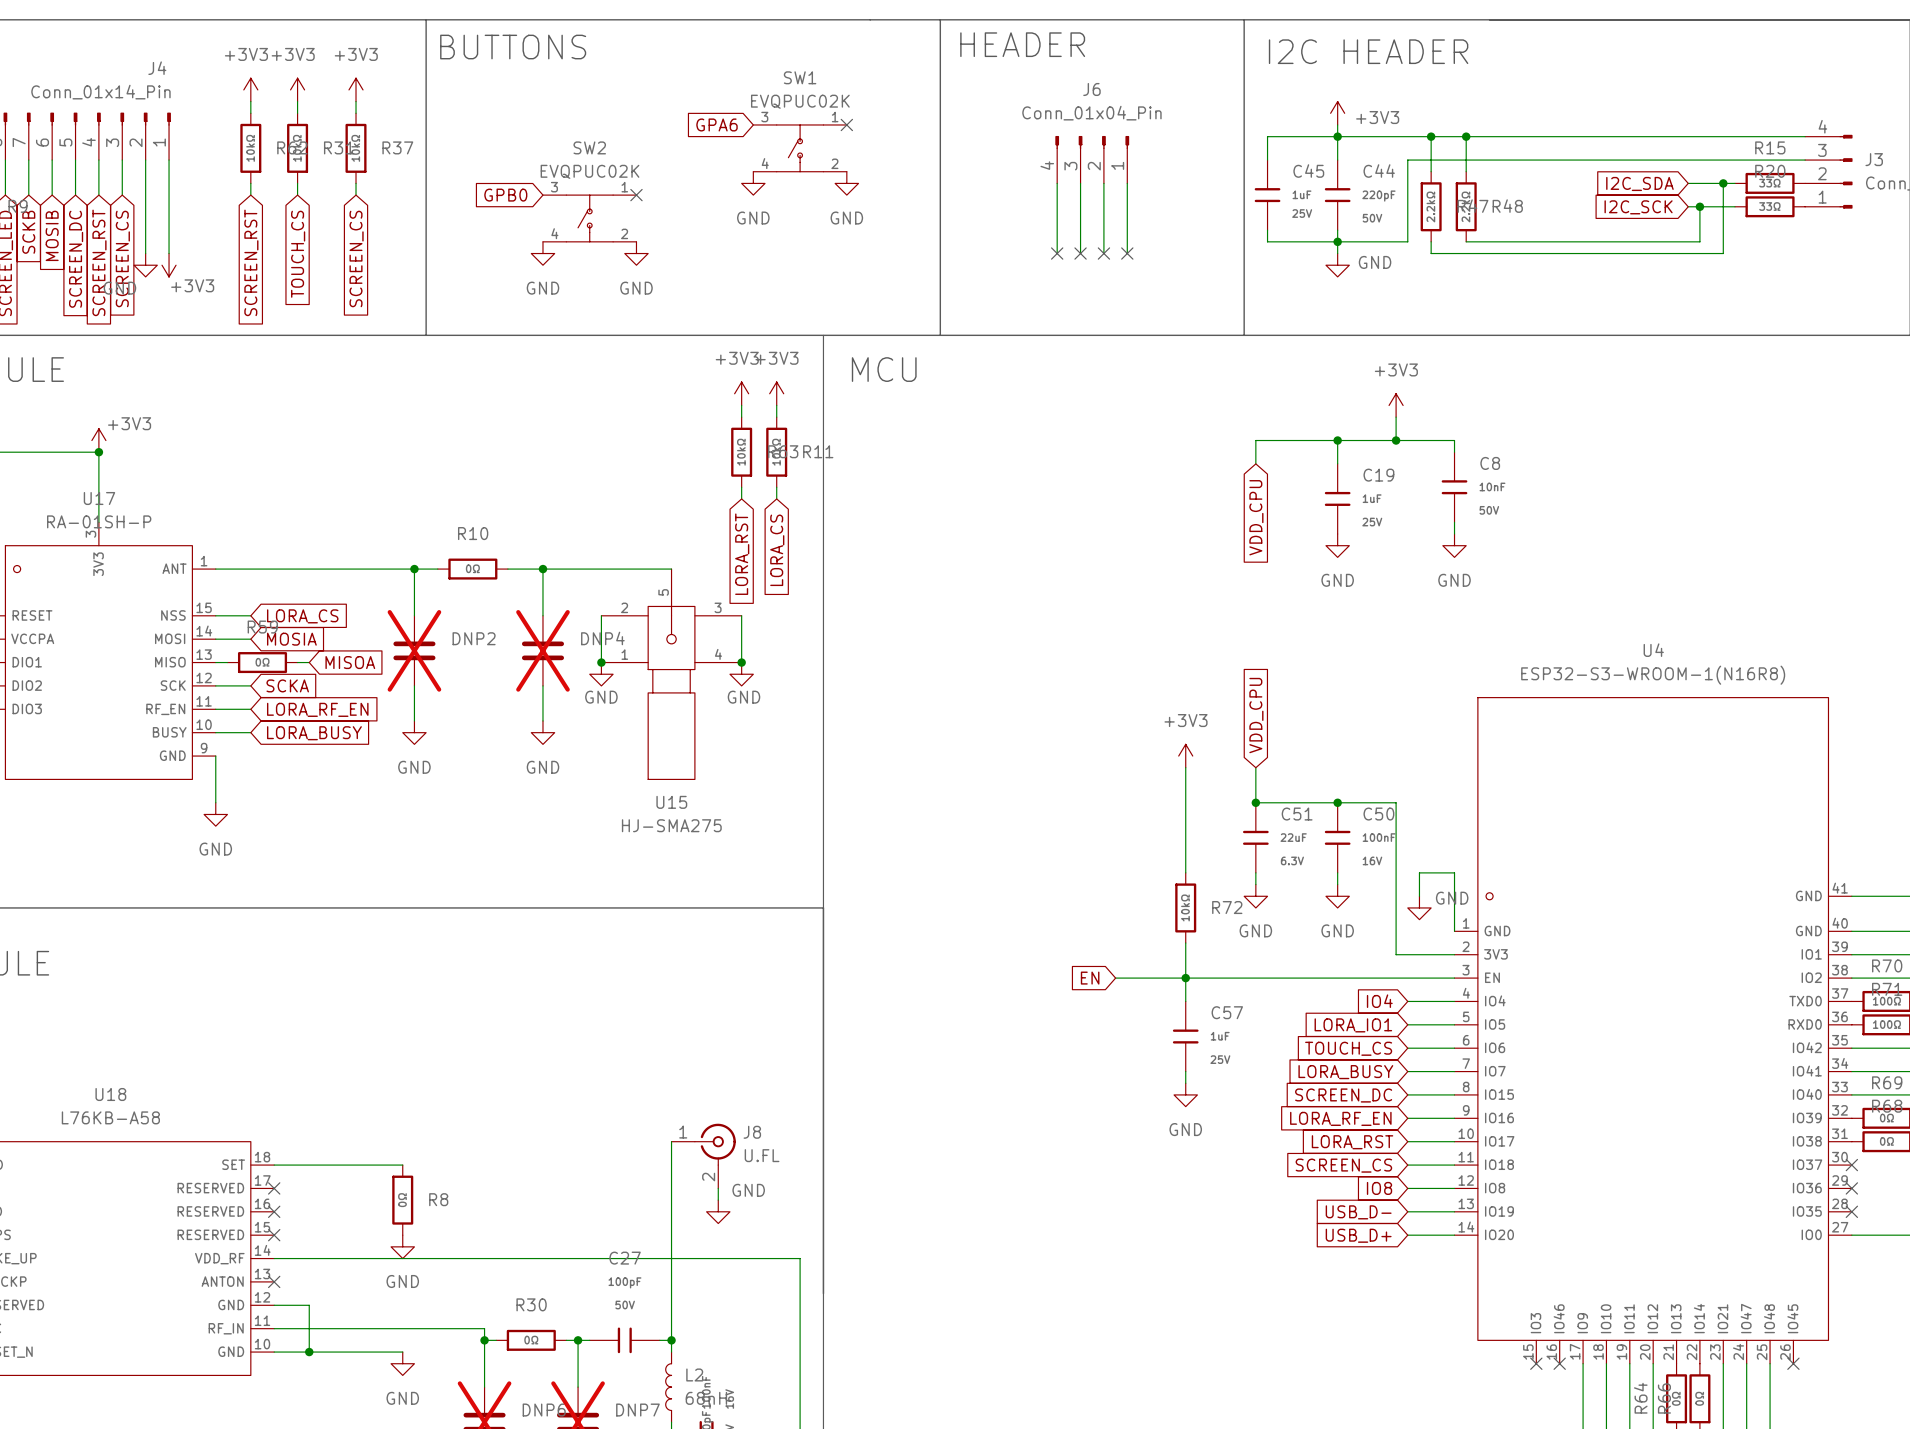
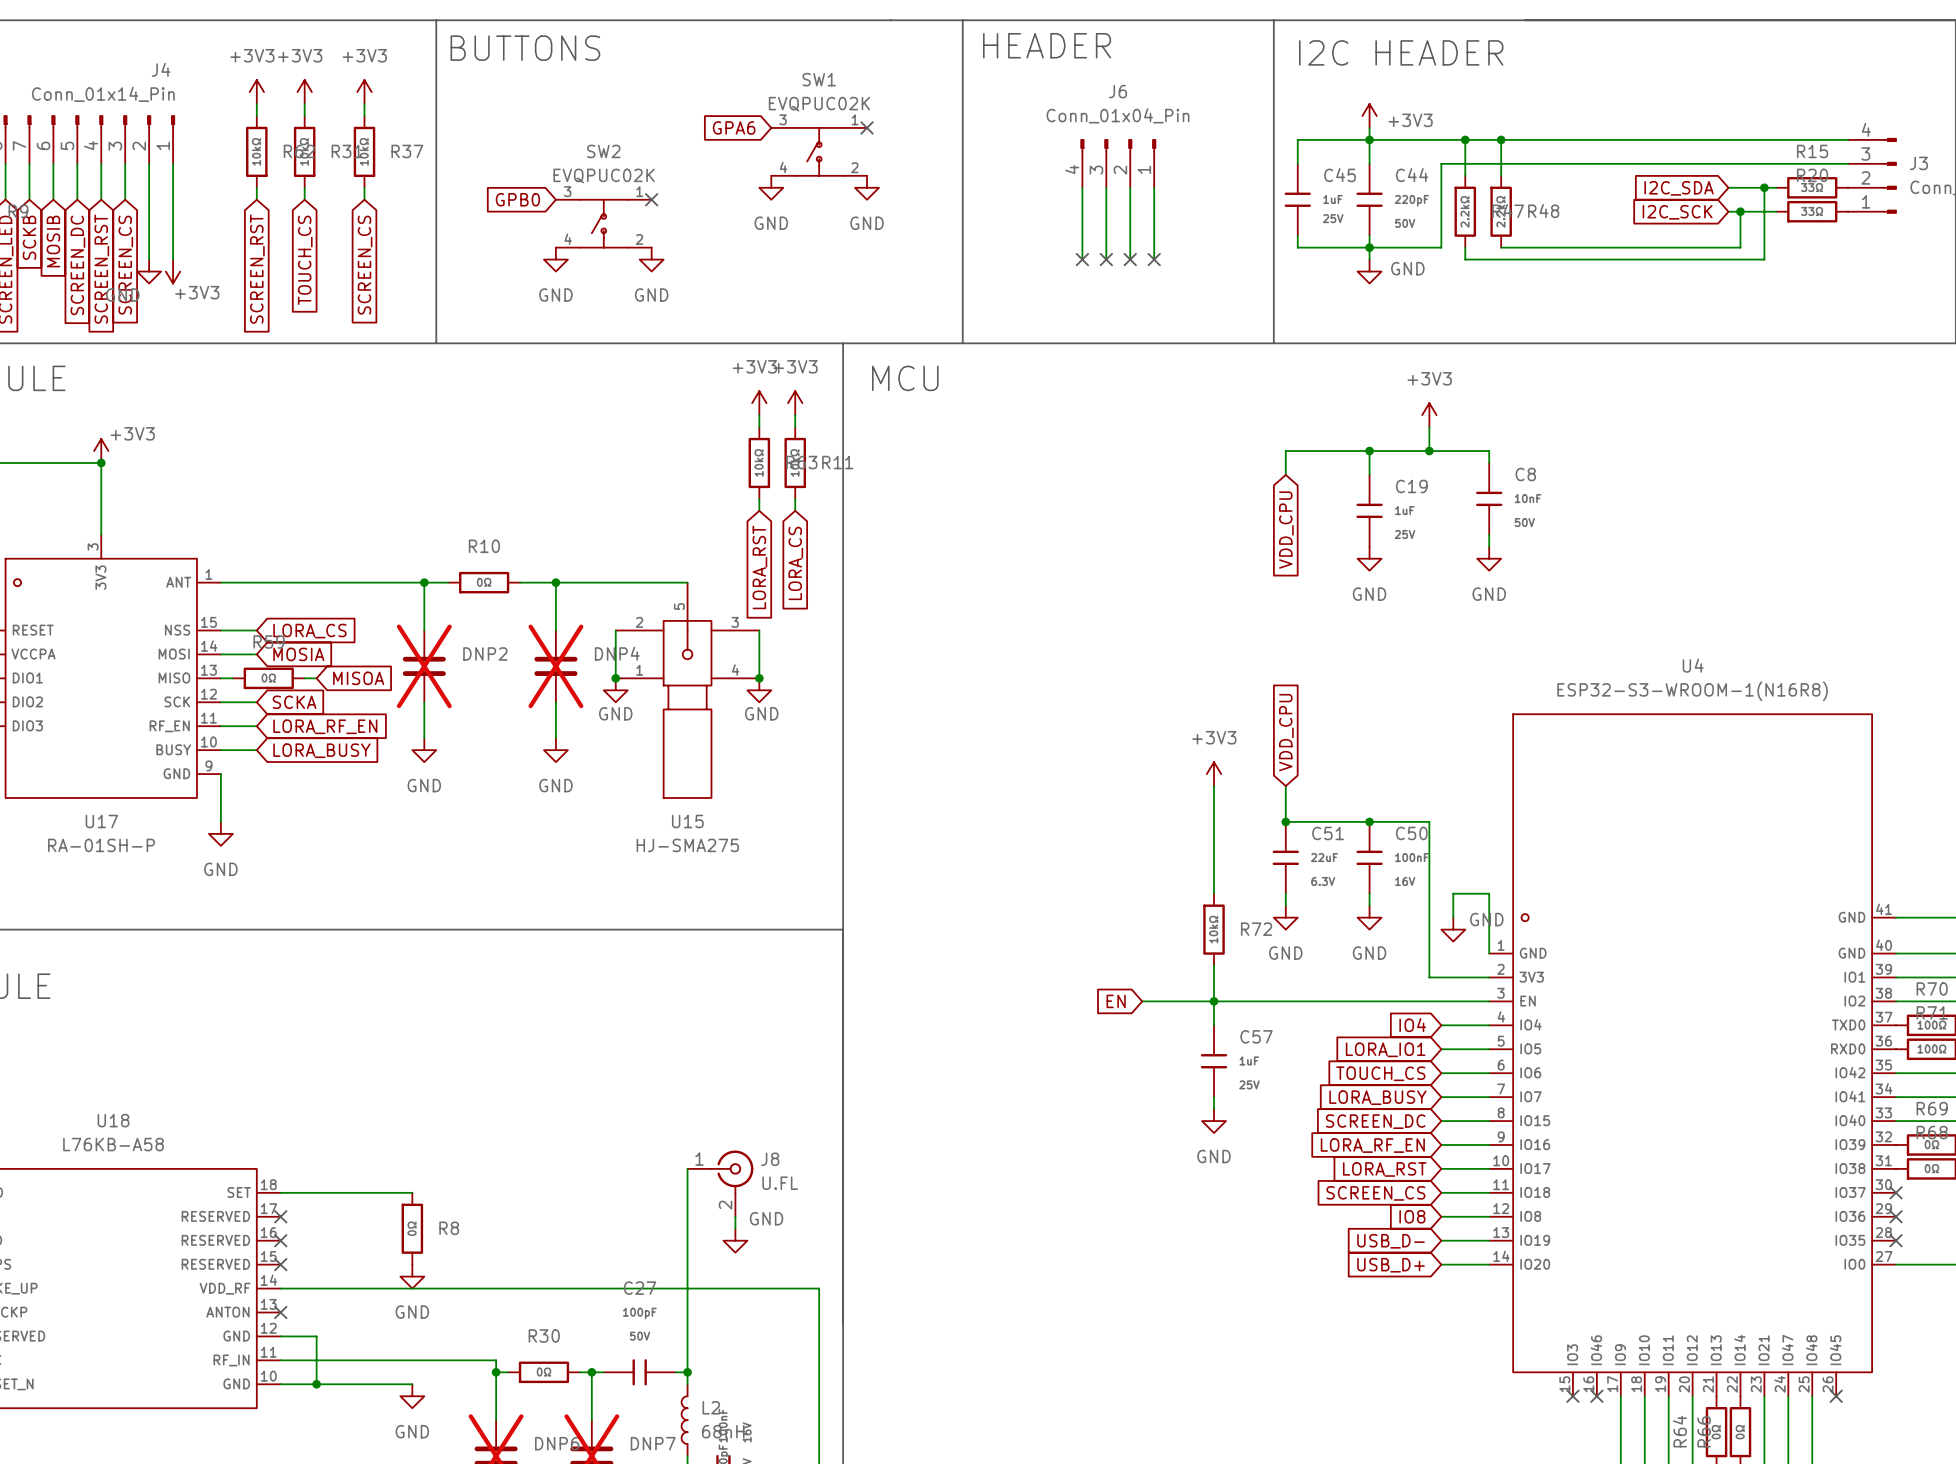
U17 name position: U17 (99, 498) -> U17 (101, 821)
U17 value position: RA-01SH-P (99, 521) -> RA-01SH-P (101, 845)

